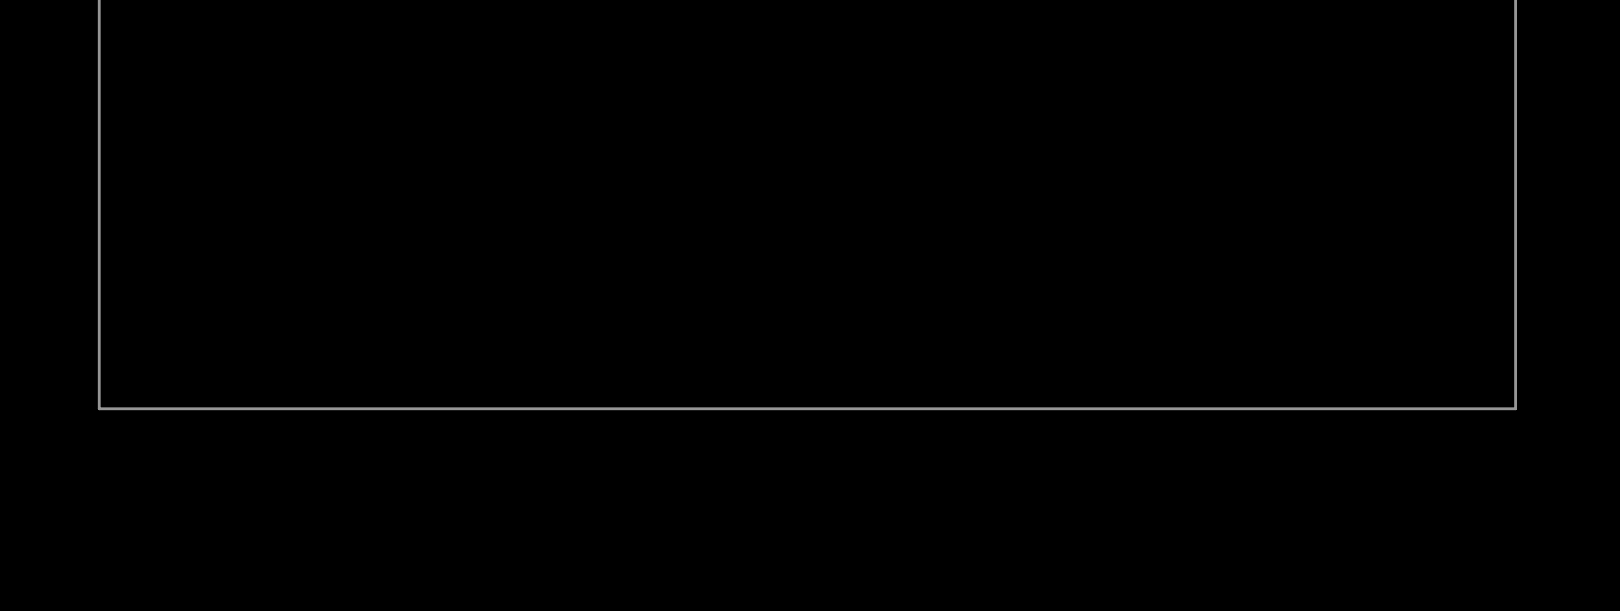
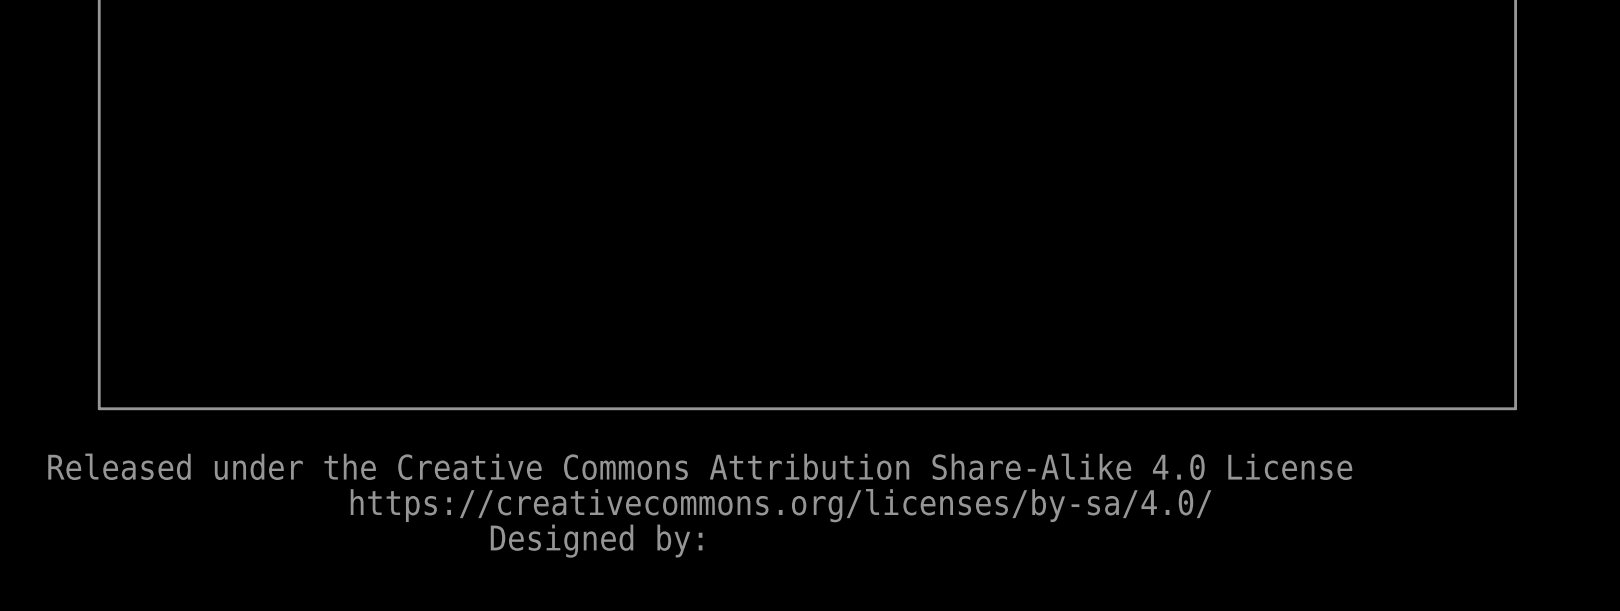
drawing: none -> [48, 453, 1353, 558]

